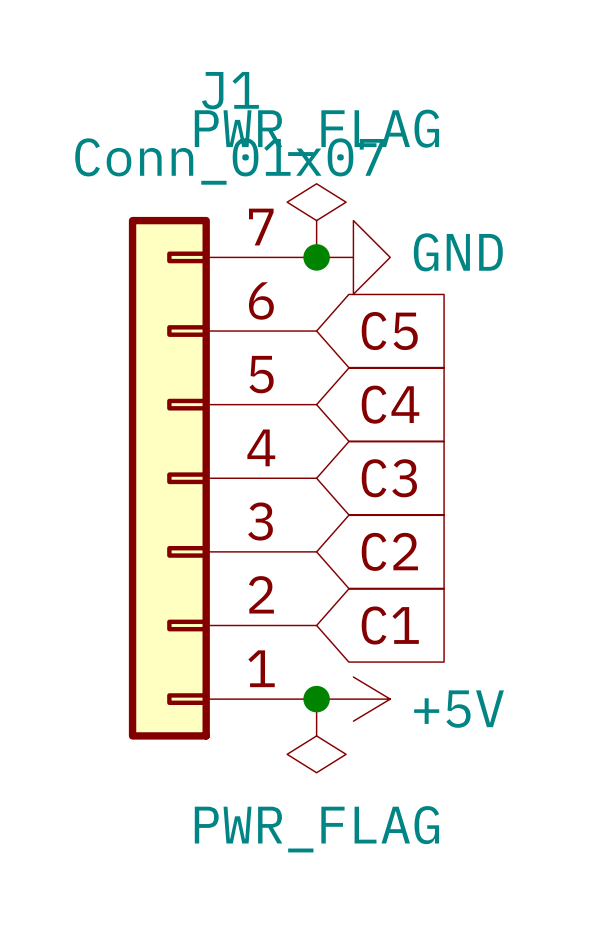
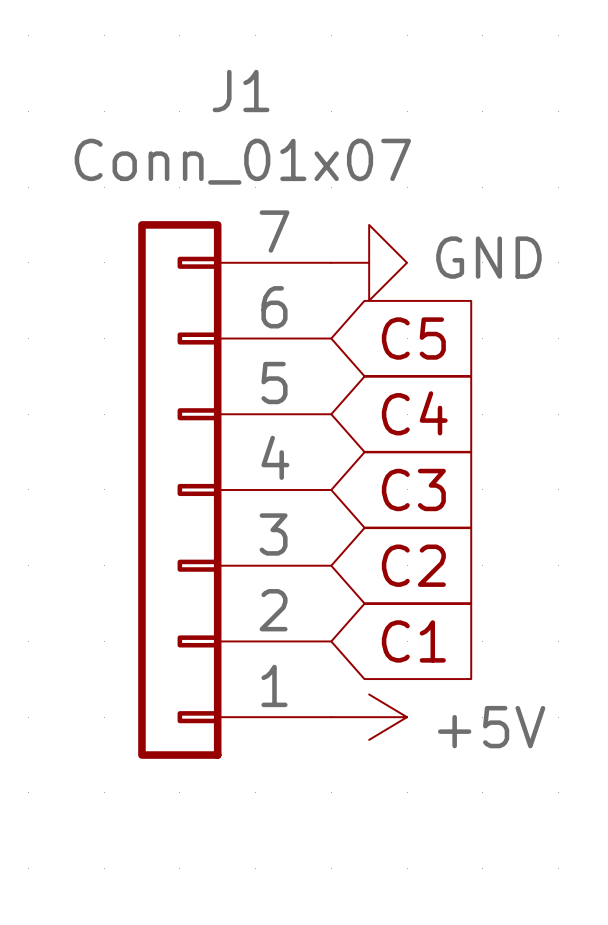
power symbol: PWR_FLAG (316, 220) -> none
junction: (316, 257) -> none
junction: (316, 699) -> none
power symbol: PWR_FLAG (316, 735) -> none

